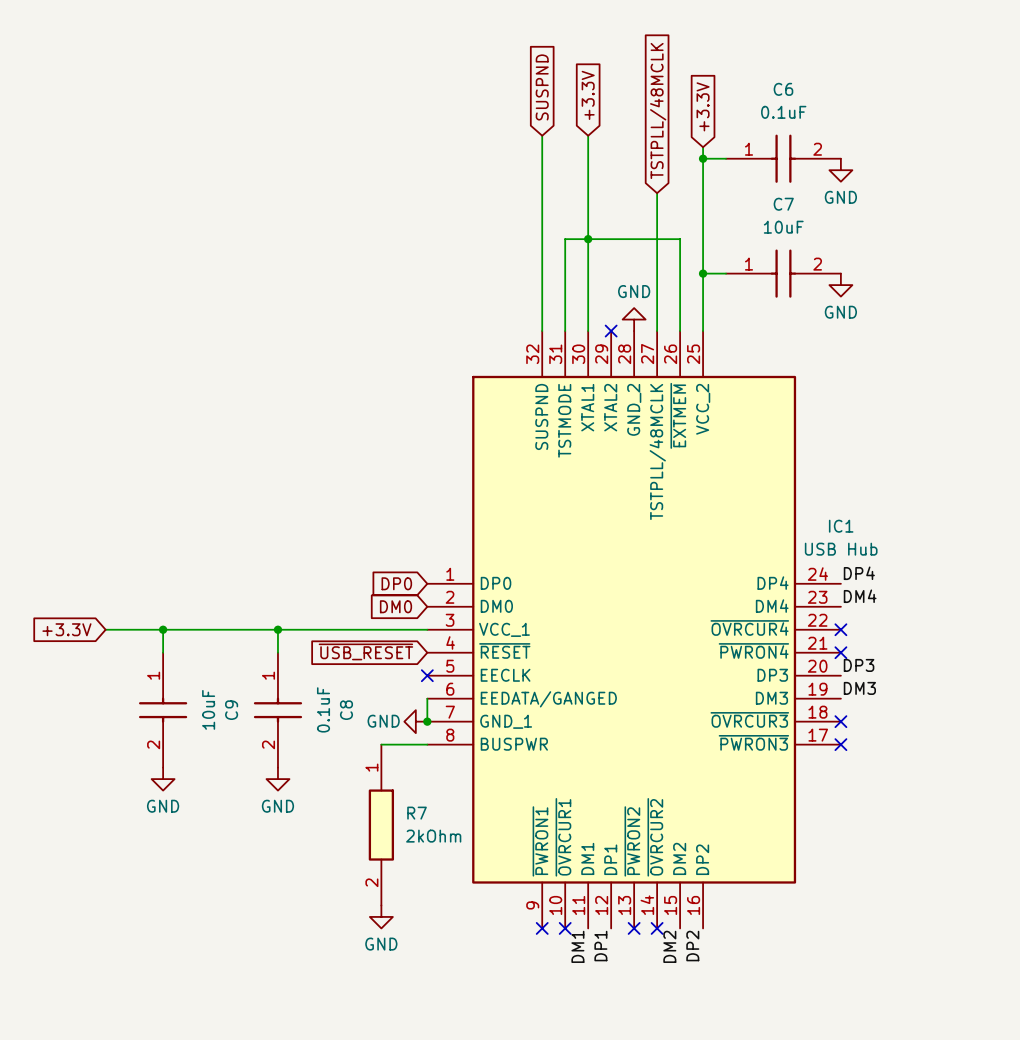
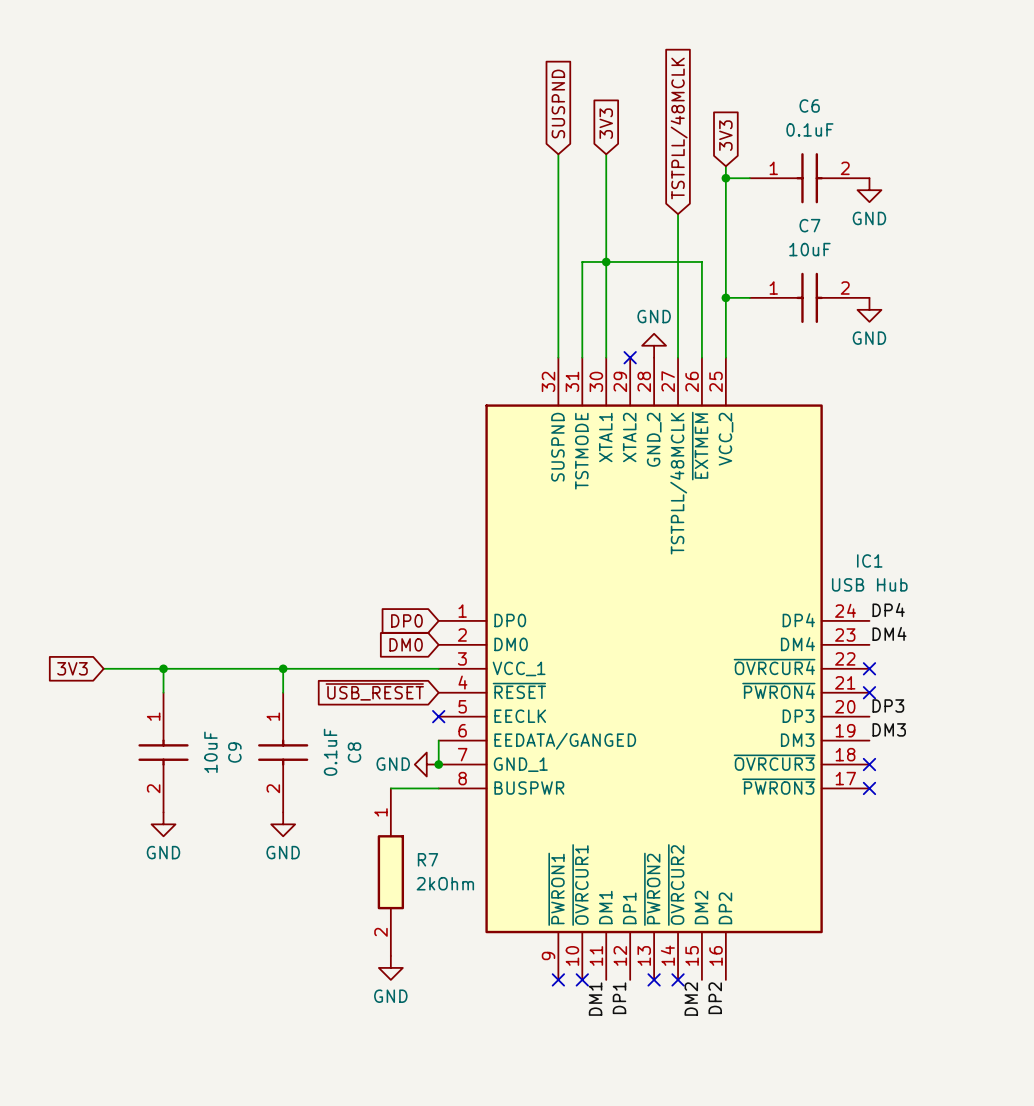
global label: +3.3V (588, 95) -> 3V3 (606, 123)
global label: +3.3V (703, 106) -> 3V3 (725, 135)
global label: +3.3V (66, 629) -> 3V3 (72, 668)

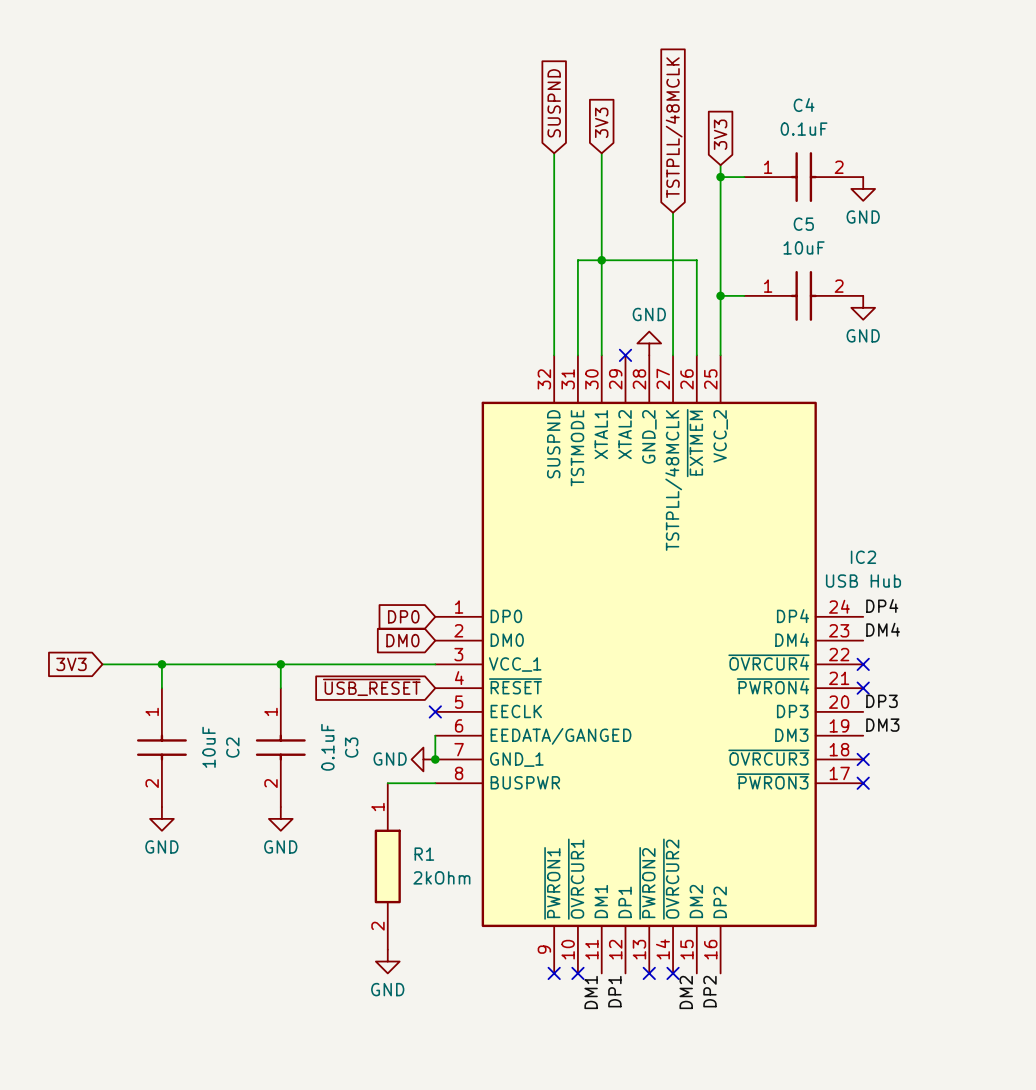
C6 name: C6 (809, 105) -> C4 (804, 105)
C7 name: C7 (809, 225) -> C5 (803, 224)
IC1 name: IC1 (869, 560) -> IC2 (863, 557)
C9 name: C9 (234, 752) -> C2 (232, 747)
C8 name: C8 (354, 752) -> C3 (351, 747)
R7 name: R7 (427, 859) -> R1 (424, 854)

